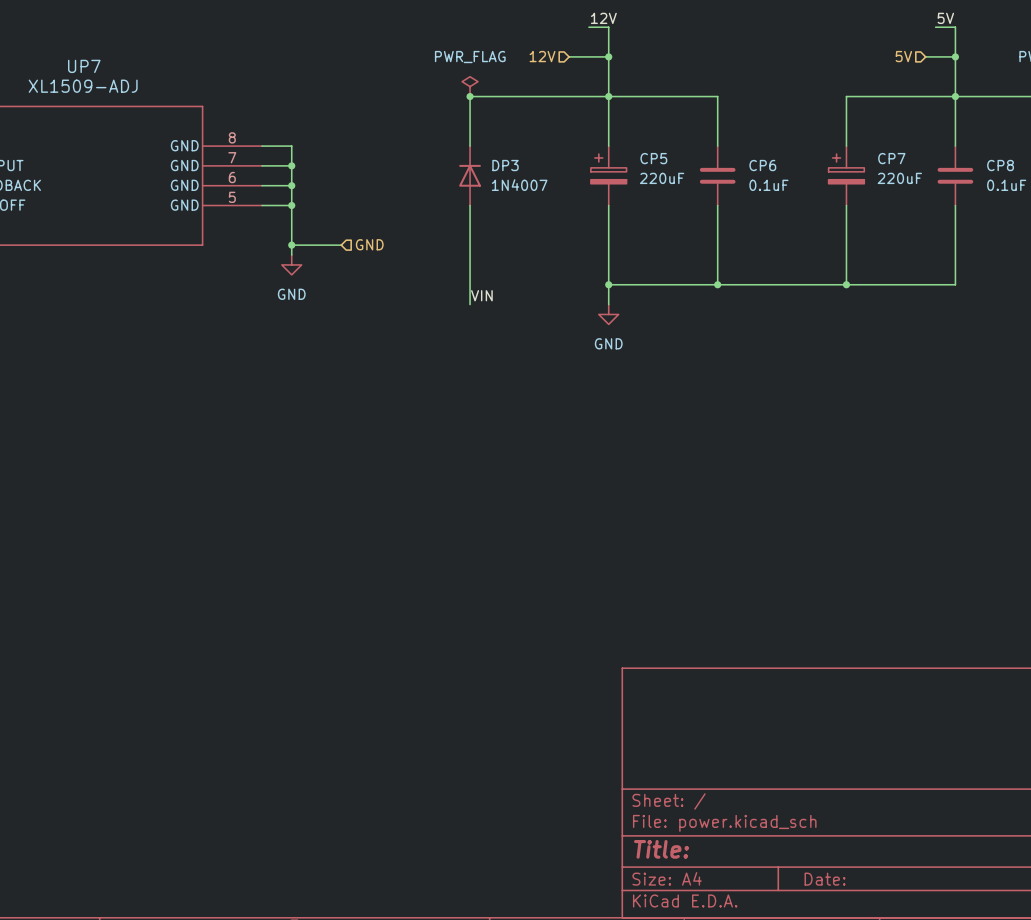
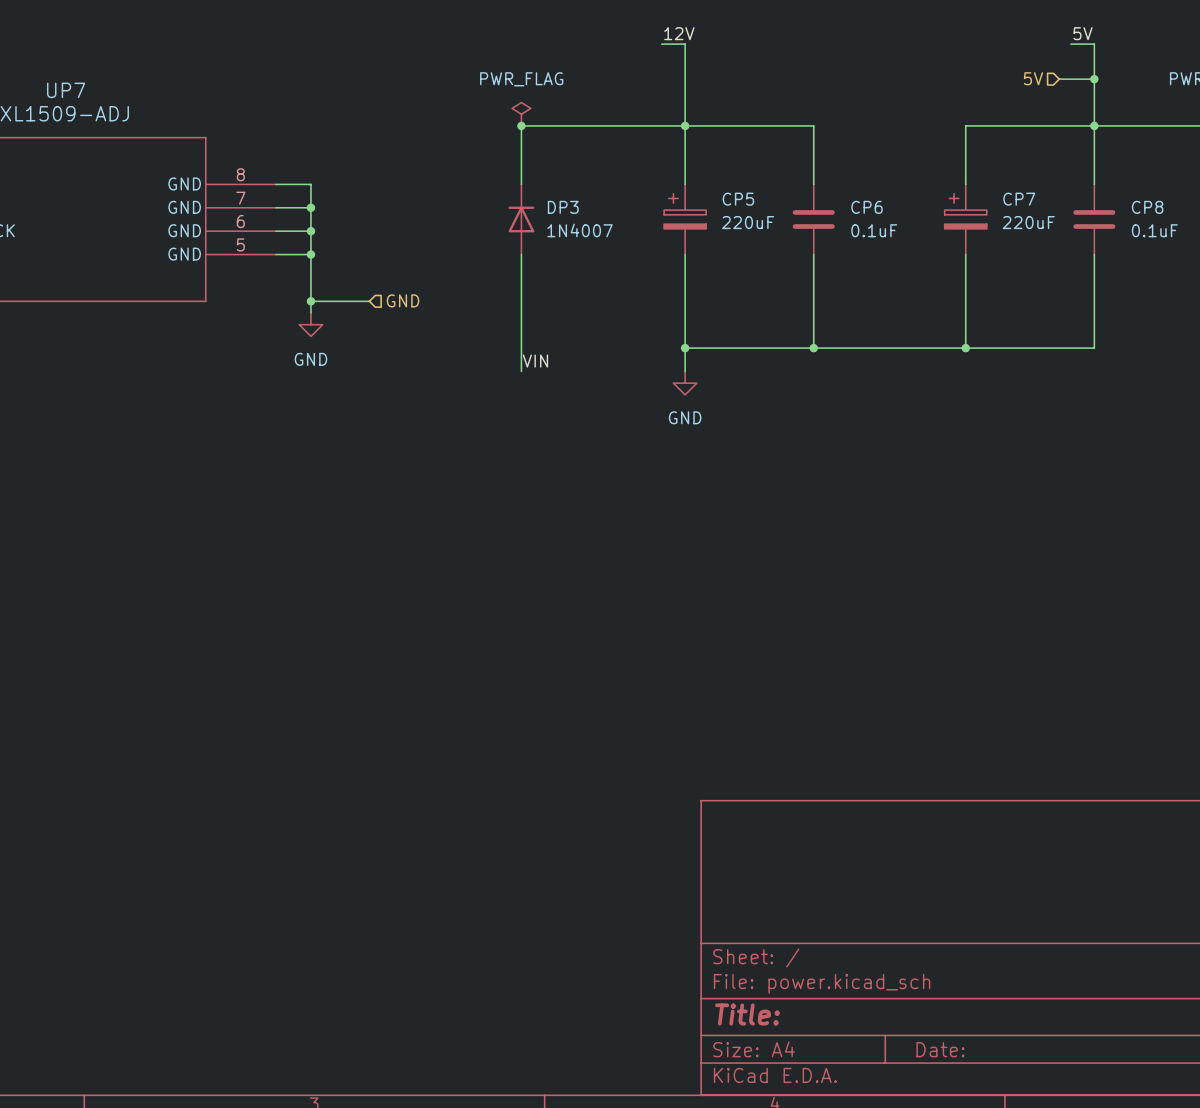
hierarchical label: 12V (542, 56) -> none
wire: (569, 56) (608, 56) -> none
junction: (608, 56) -> none

